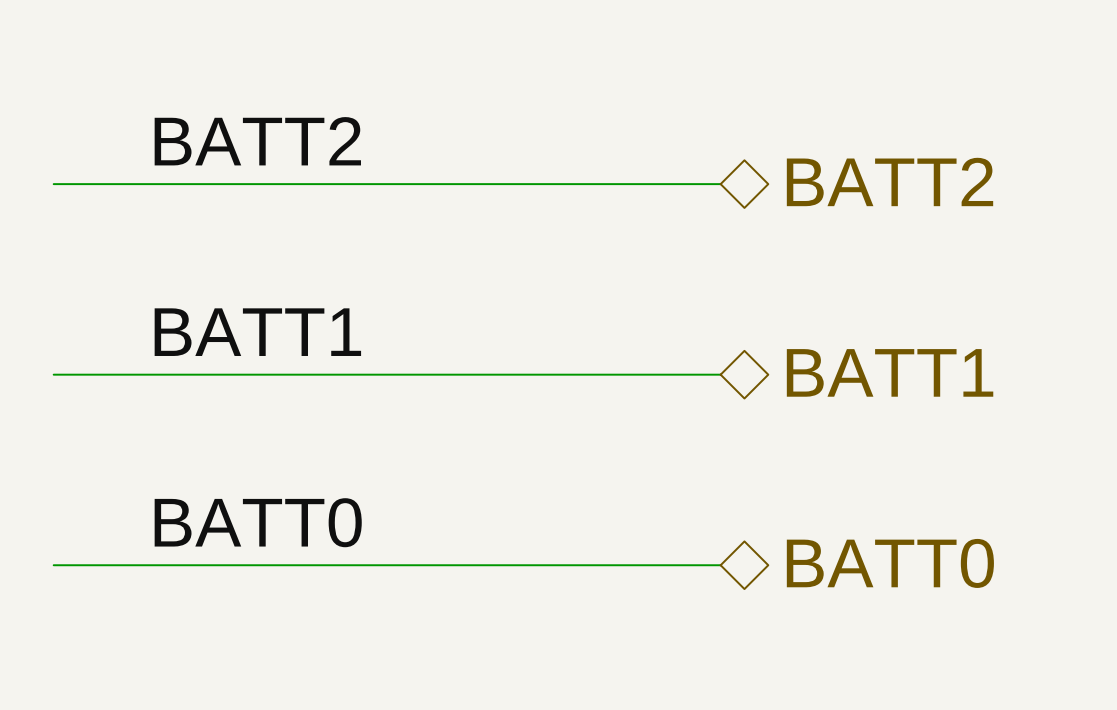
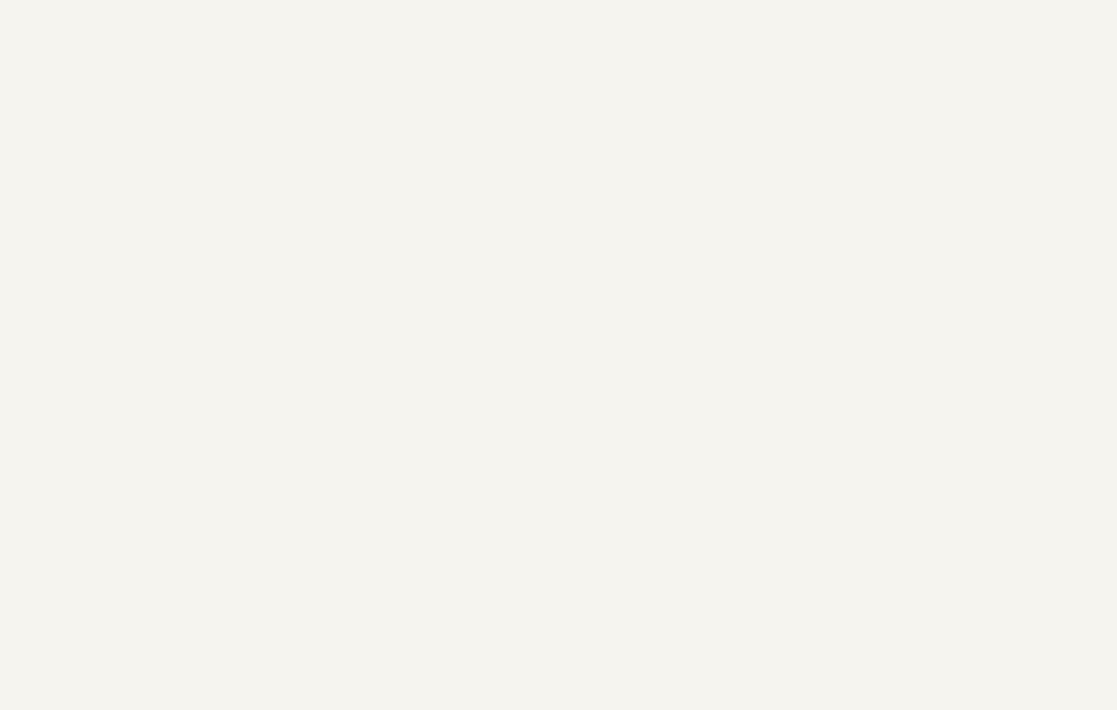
label: BATT2 (257, 141) -> none
hierarchical label: BATT2 (890, 181) -> none
wire: (53, 184) (720, 184) -> none
label: BATT1 (257, 332) -> none
hierarchical label: BATT1 (890, 372) -> none
wire: (53, 374) (720, 374) -> none
label: BATT0 (258, 522) -> none
hierarchical label: BATT0 (890, 563) -> none
wire: (53, 565) (720, 565) -> none

